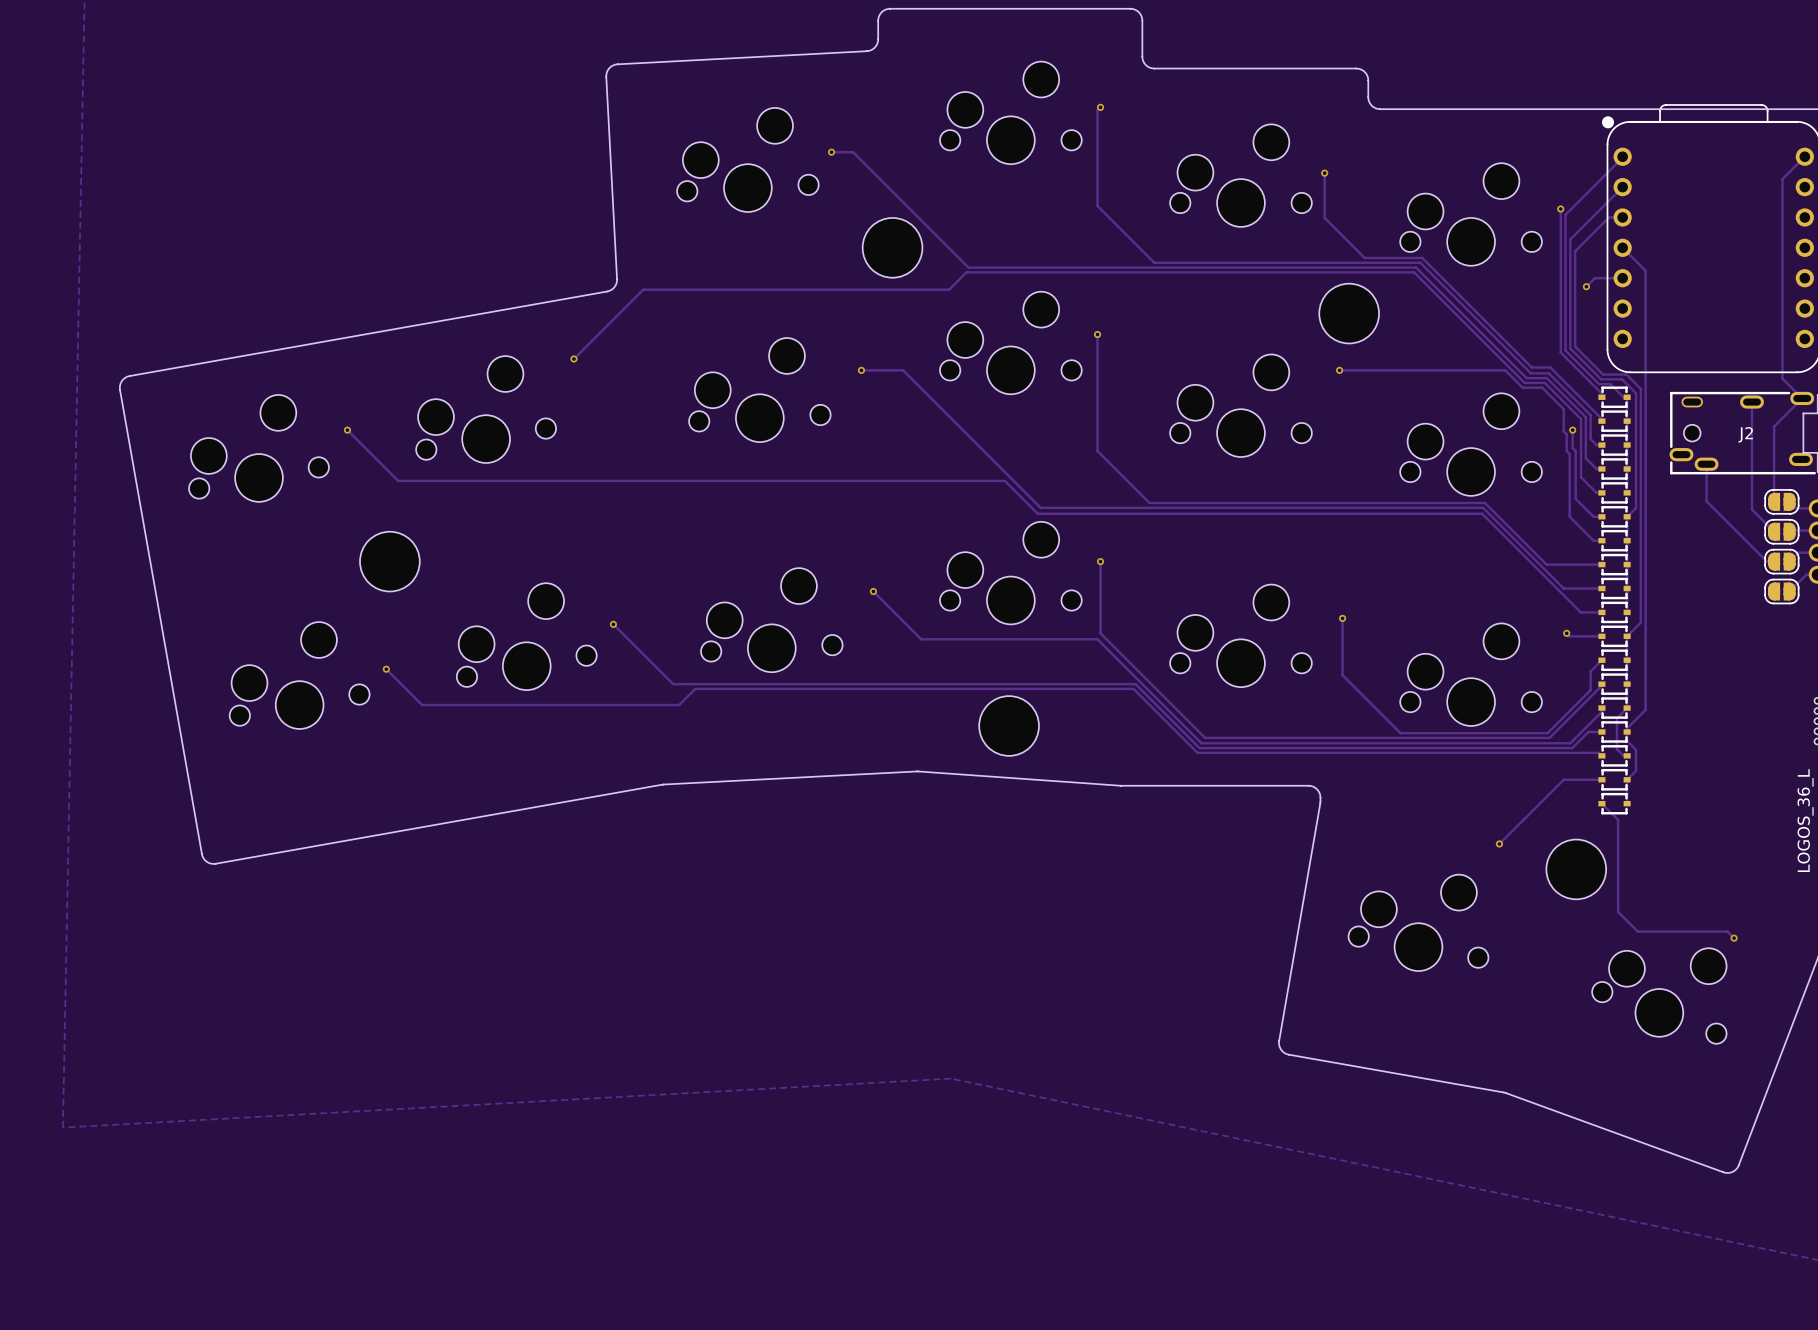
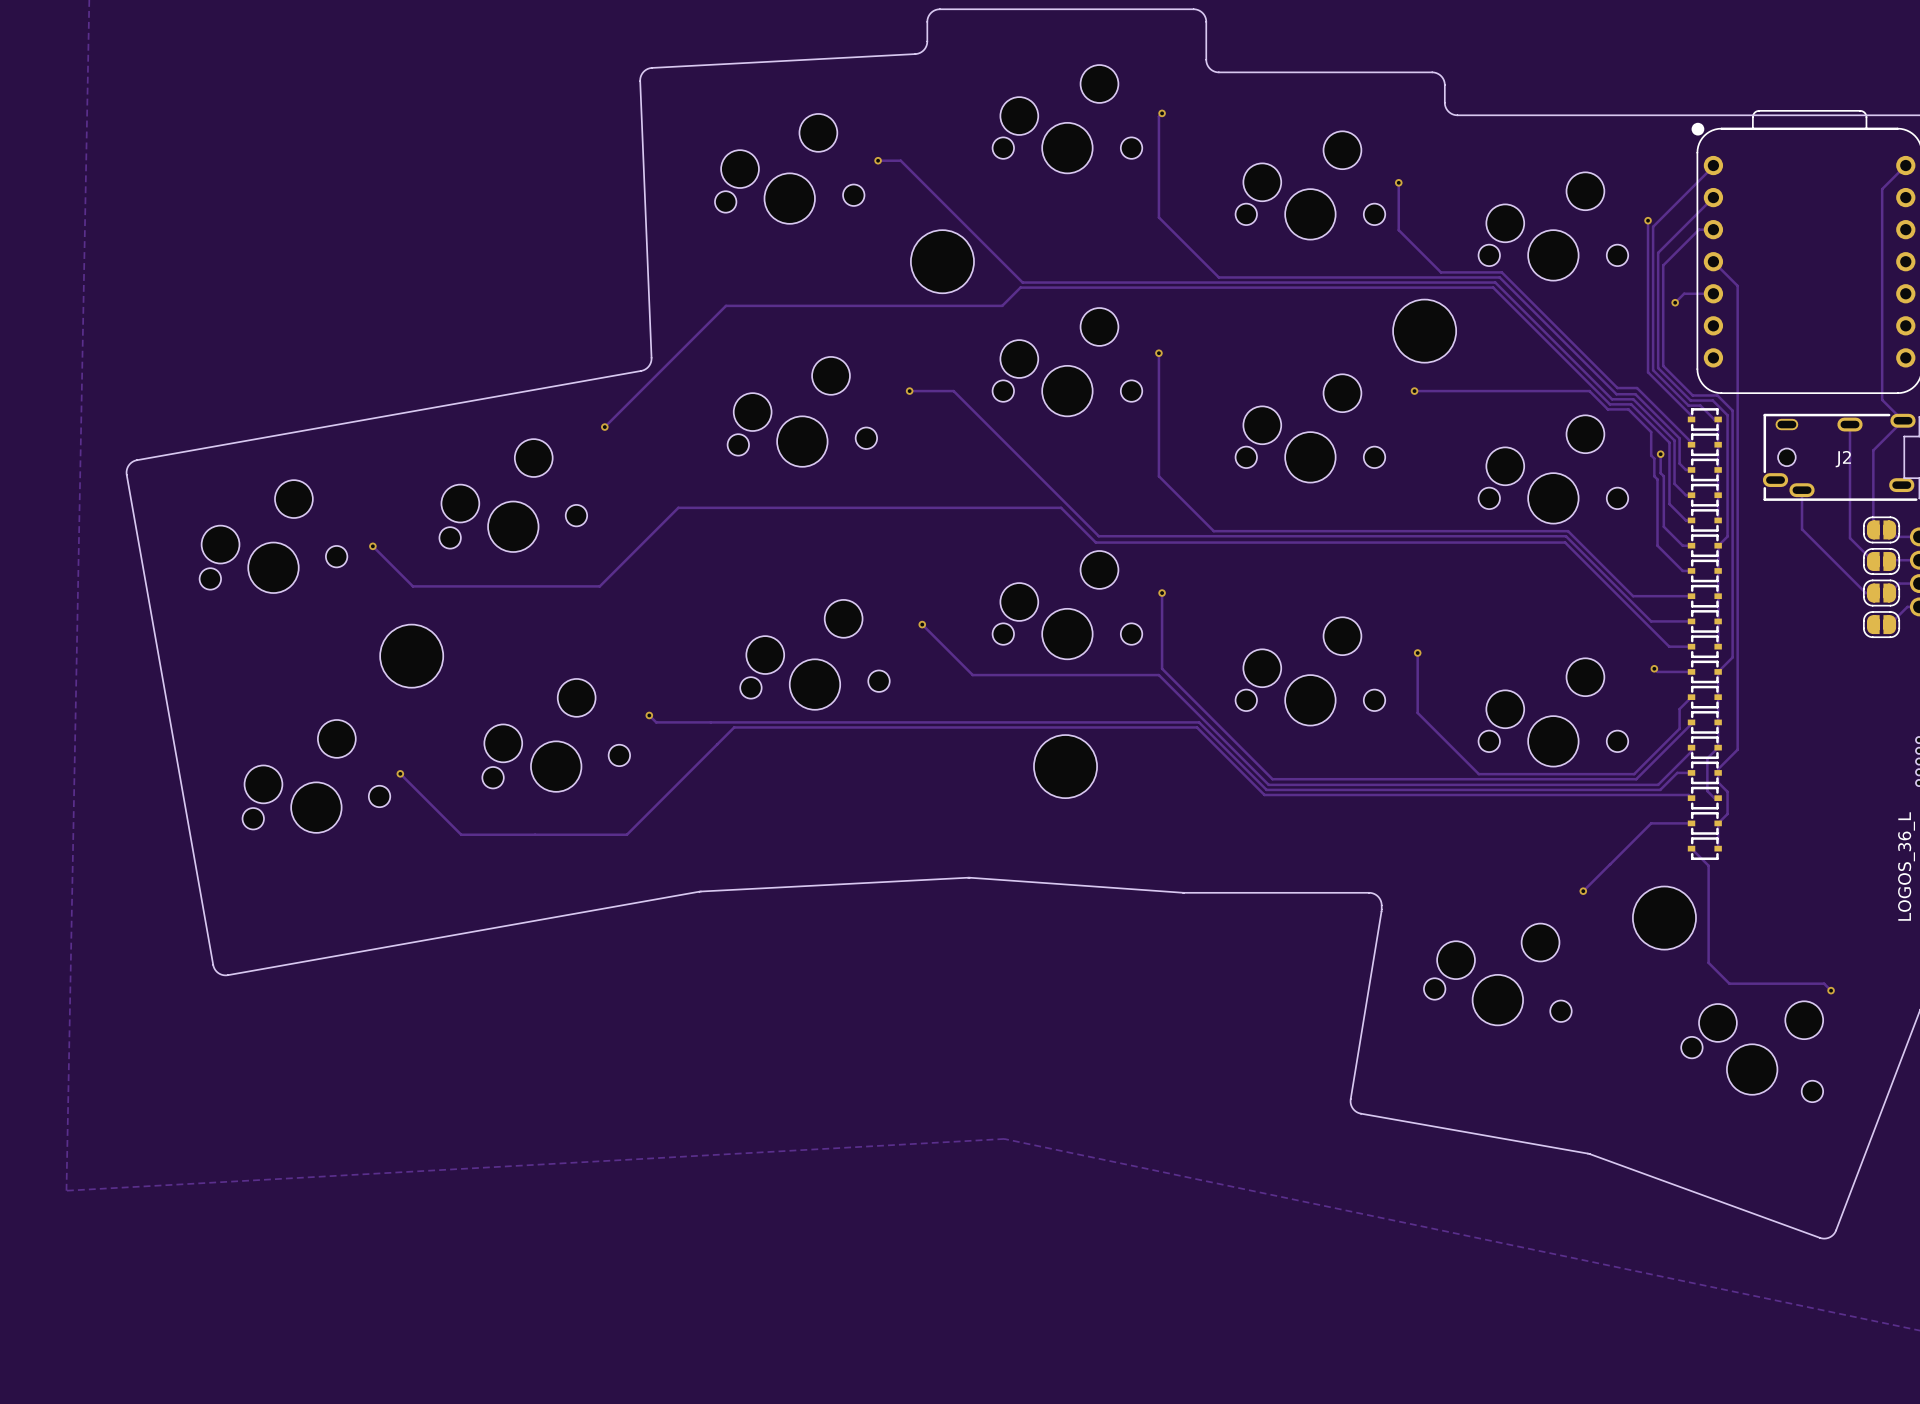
board edge: (606, 76) (617, 279) (615, 284) (611, 290) (129, 376) (121, 382) (120, 389) (203, 858) (209, 863) (215, 863) (663, 784) (917, 771) (1120, 785) (1309, 785) (1318, 791) (1320, 802) (1279, 1040) -> (640, 81) (651, 357) (646, 368) (136, 460) (127, 466) (126, 474) (215, 970) (220, 974) (227, 975) (700, 891) (968, 877) (1183, 892) (1370, 892) (1379, 898) (1381, 910) (1350, 1099)
track: (687, 289) (643, 289) (573, 359) -> (725, 305) (604, 427)
via position: (573, 359) -> (604, 427)
part position: (486, 409) -> (513, 495)
track: (347, 430) (398, 480) (642, 480) -> (372, 546) (412, 586) (599, 586) (678, 507)
via: (347, 430) -> none
part position: (258, 448) -> (273, 536)
via: none -> (372, 546)
part position: (389, 561) -> (411, 656)
track: (613, 624) (673, 684) -> (649, 715) (656, 722) (710, 722)
via position: (613, 624) -> (649, 715)
part position: (526, 636) -> (556, 735)
track: (386, 669) (422, 705) (679, 705) -> (400, 773) (461, 834) (626, 834) (717, 744)
via position: (386, 669) -> (400, 773)
part position: (299, 675) -> (316, 776)

